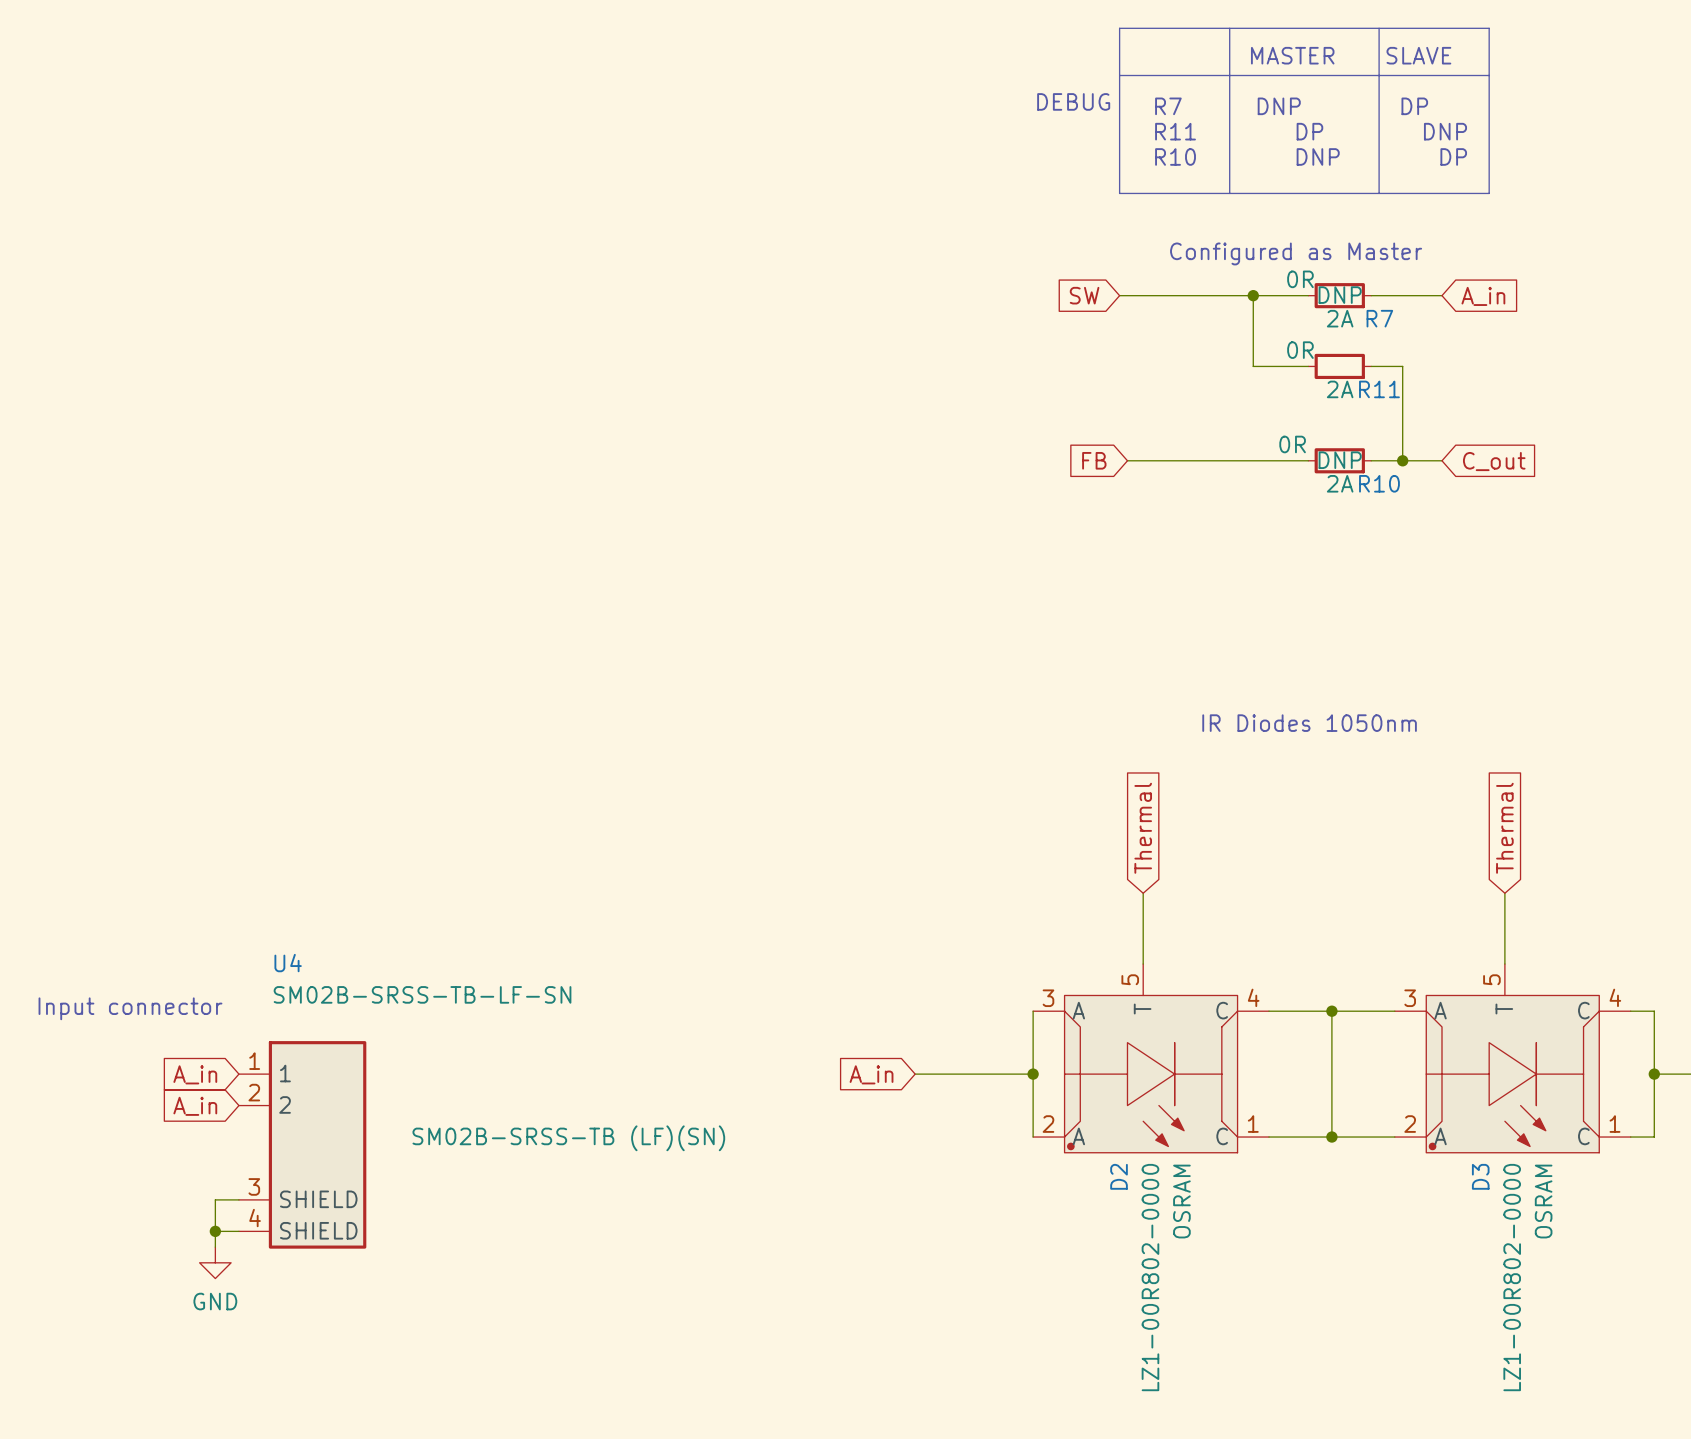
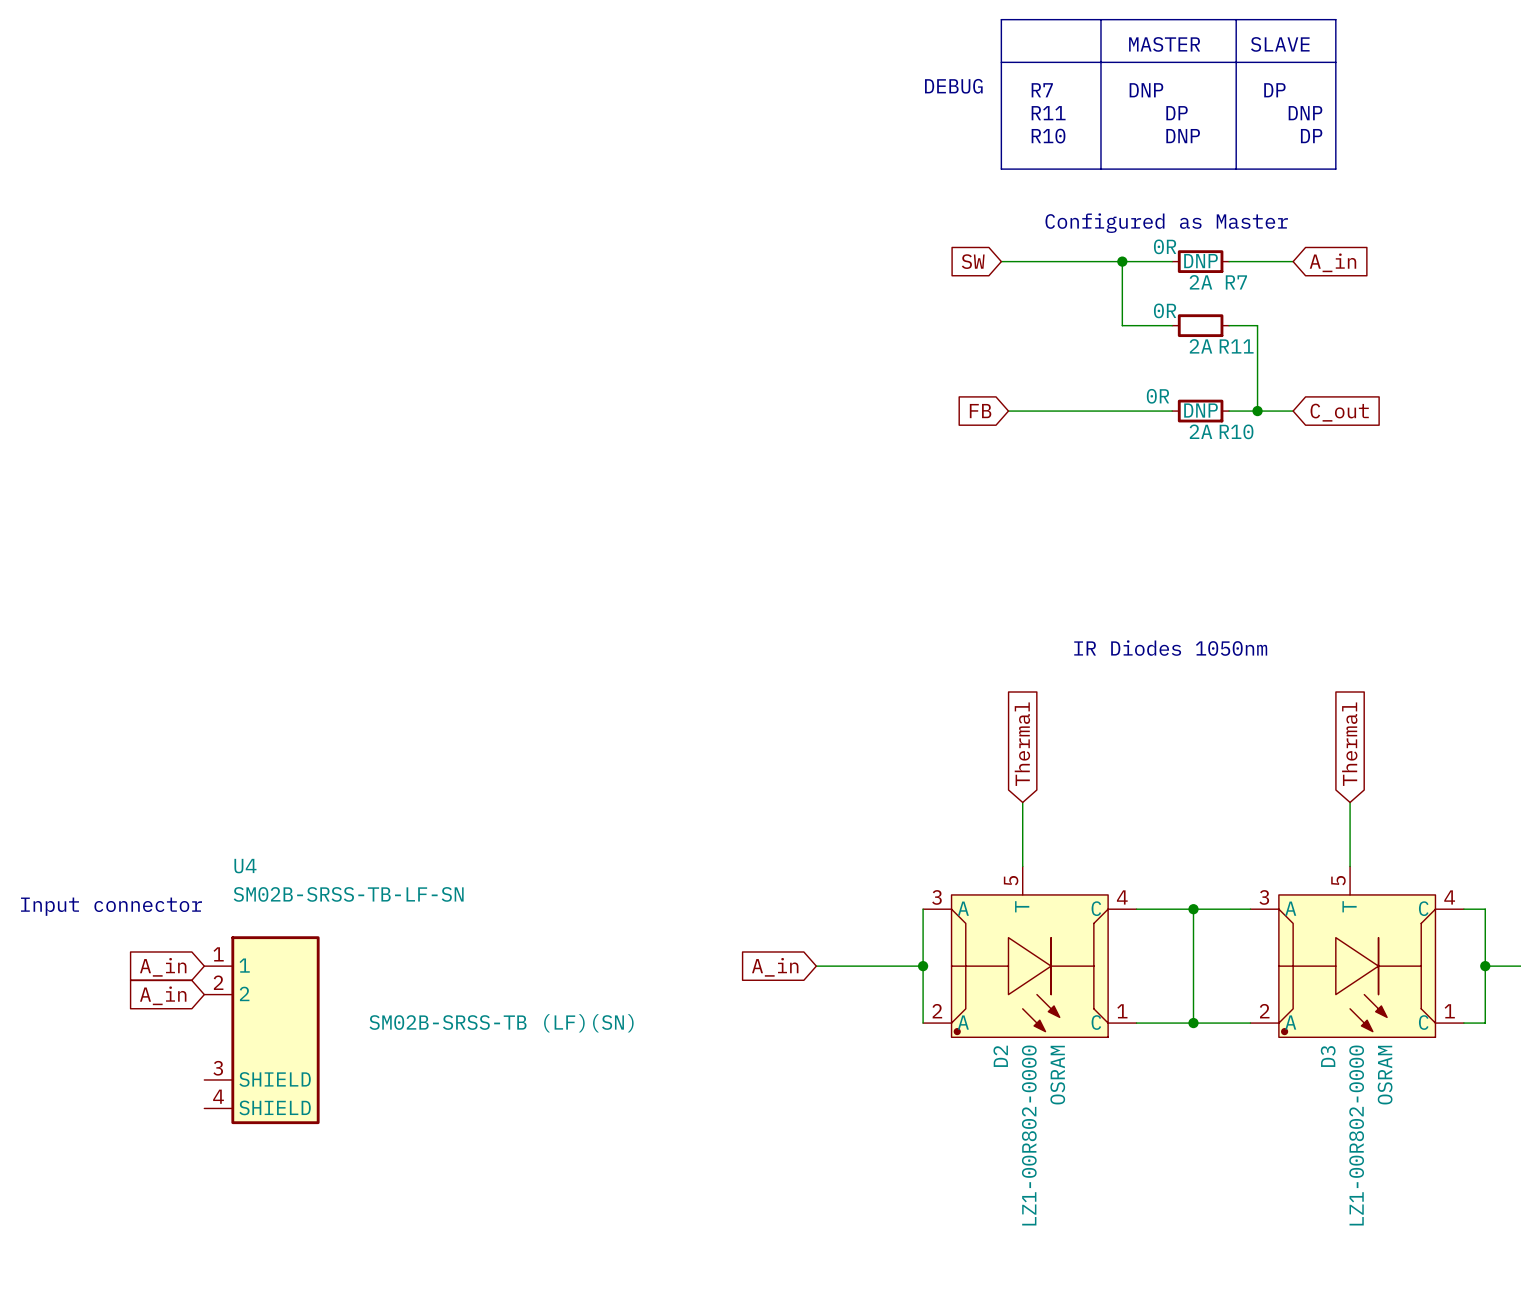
wire: (238, 1199) (215, 1199) (215, 1247) -> none
wire: (215, 1231) (238, 1231) -> none
junction: (215, 1231) -> none
power symbol: GND (215, 1262) -> none

